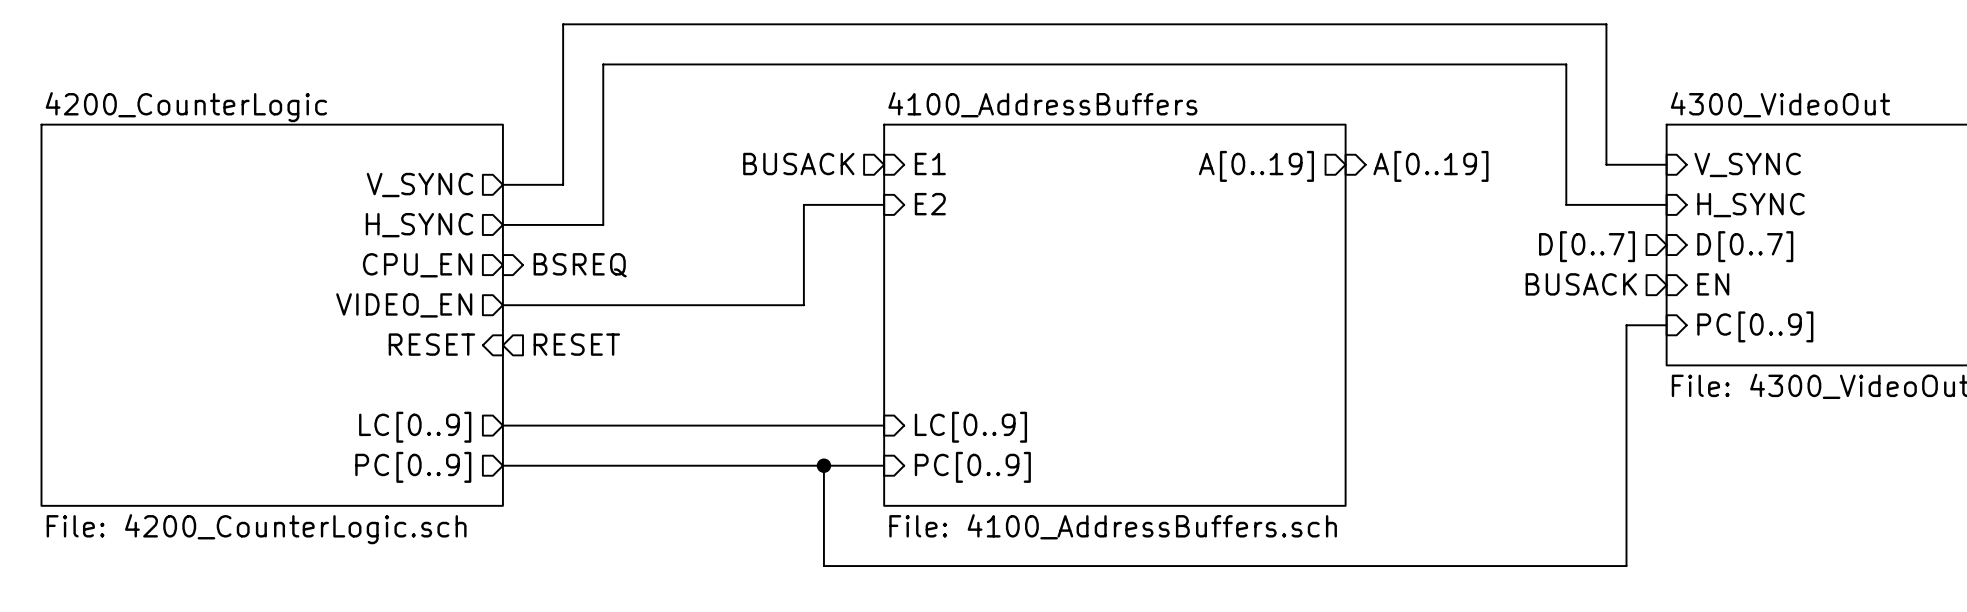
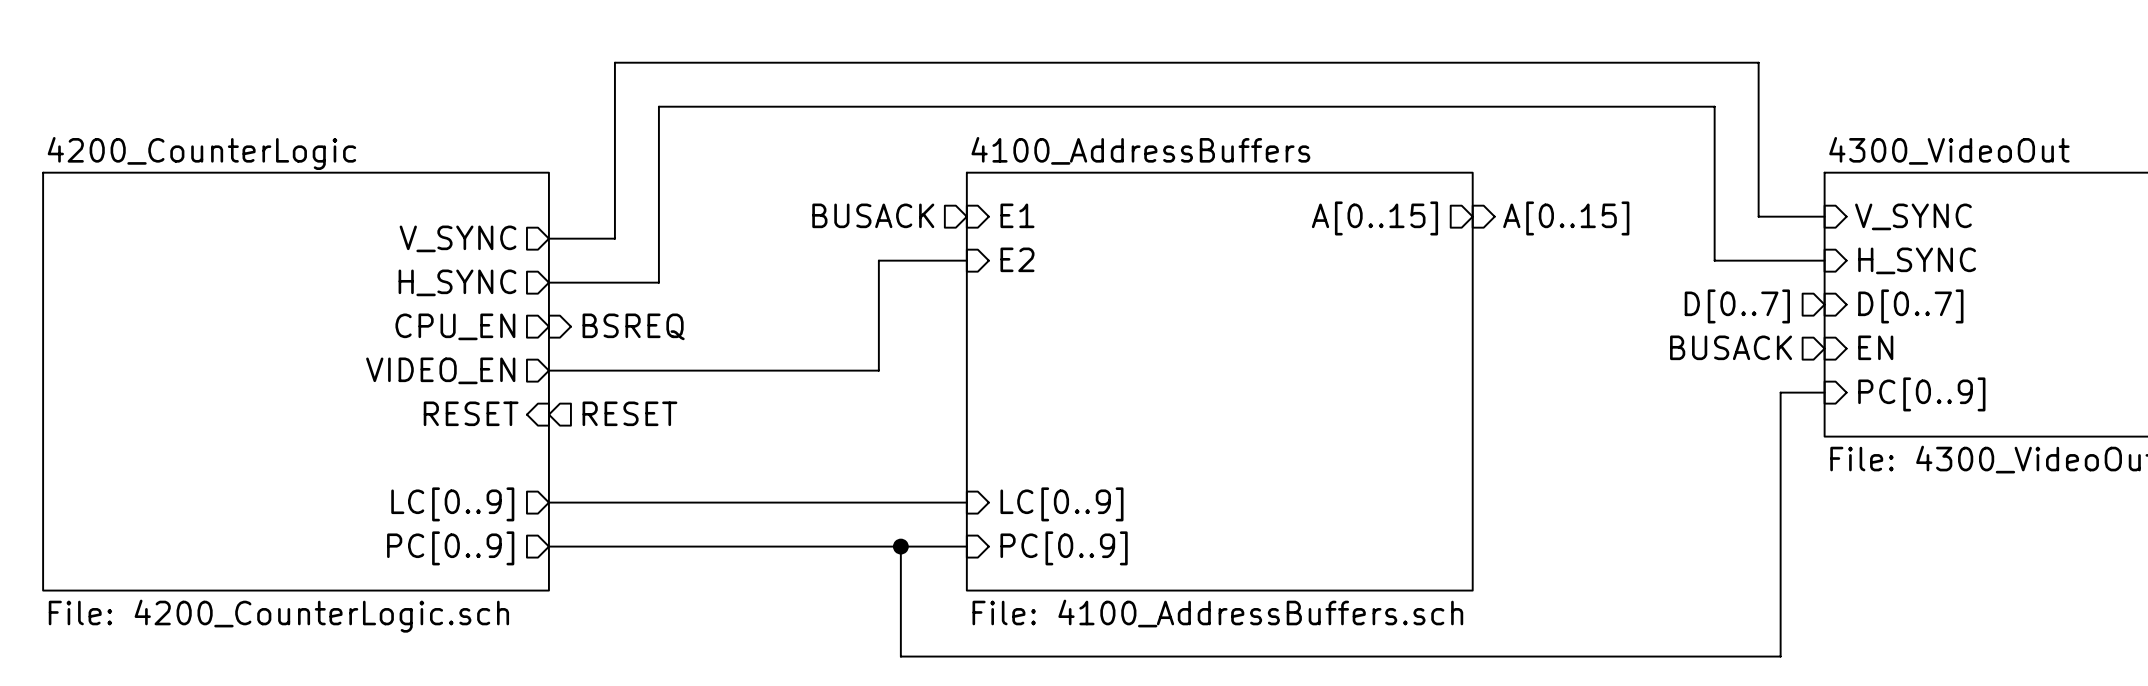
sheet pin: A[0..19] (1256, 166) -> A[0..15] (1374, 218)
hierarchical label: A[0..19] (1430, 166) -> A[0..15] (1566, 218)

